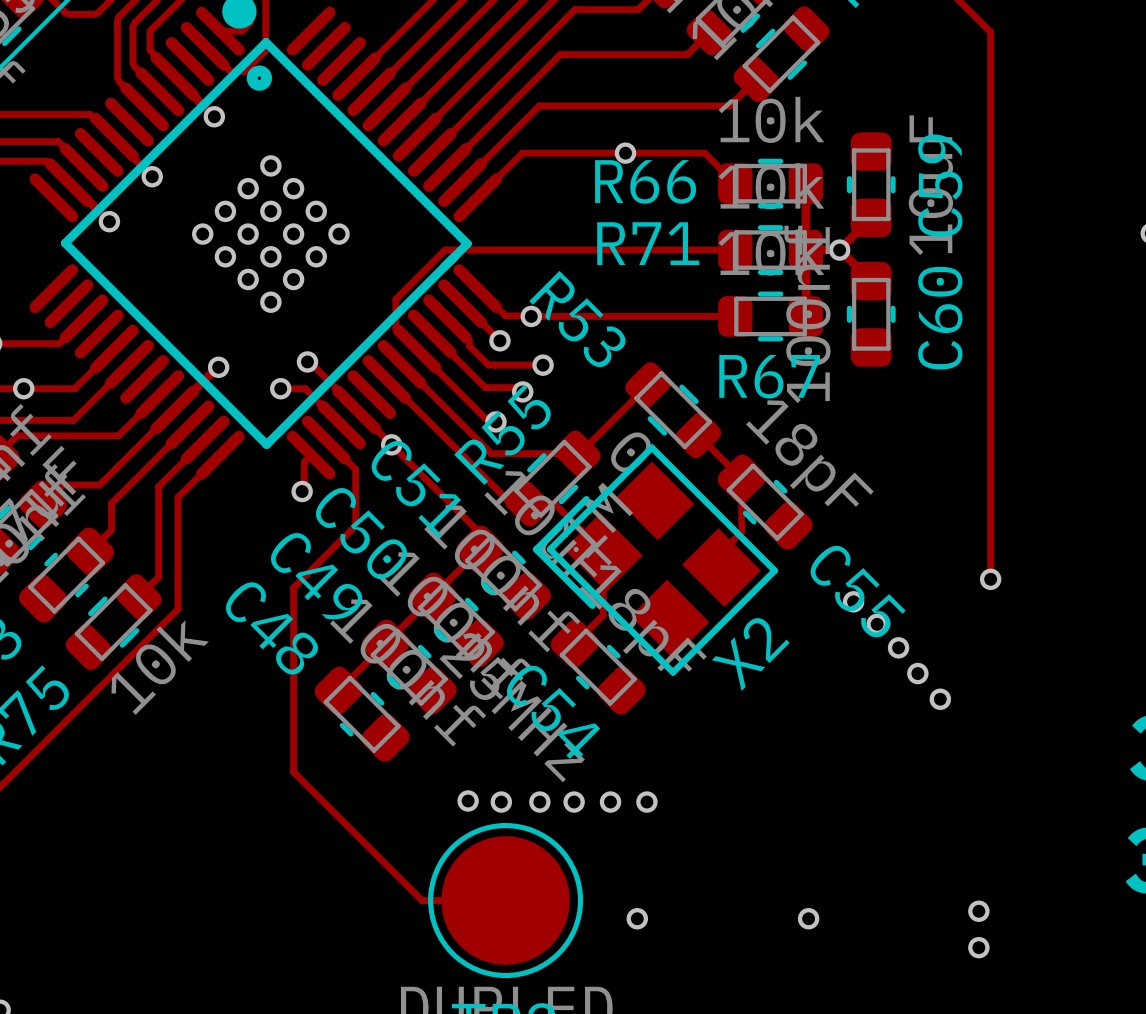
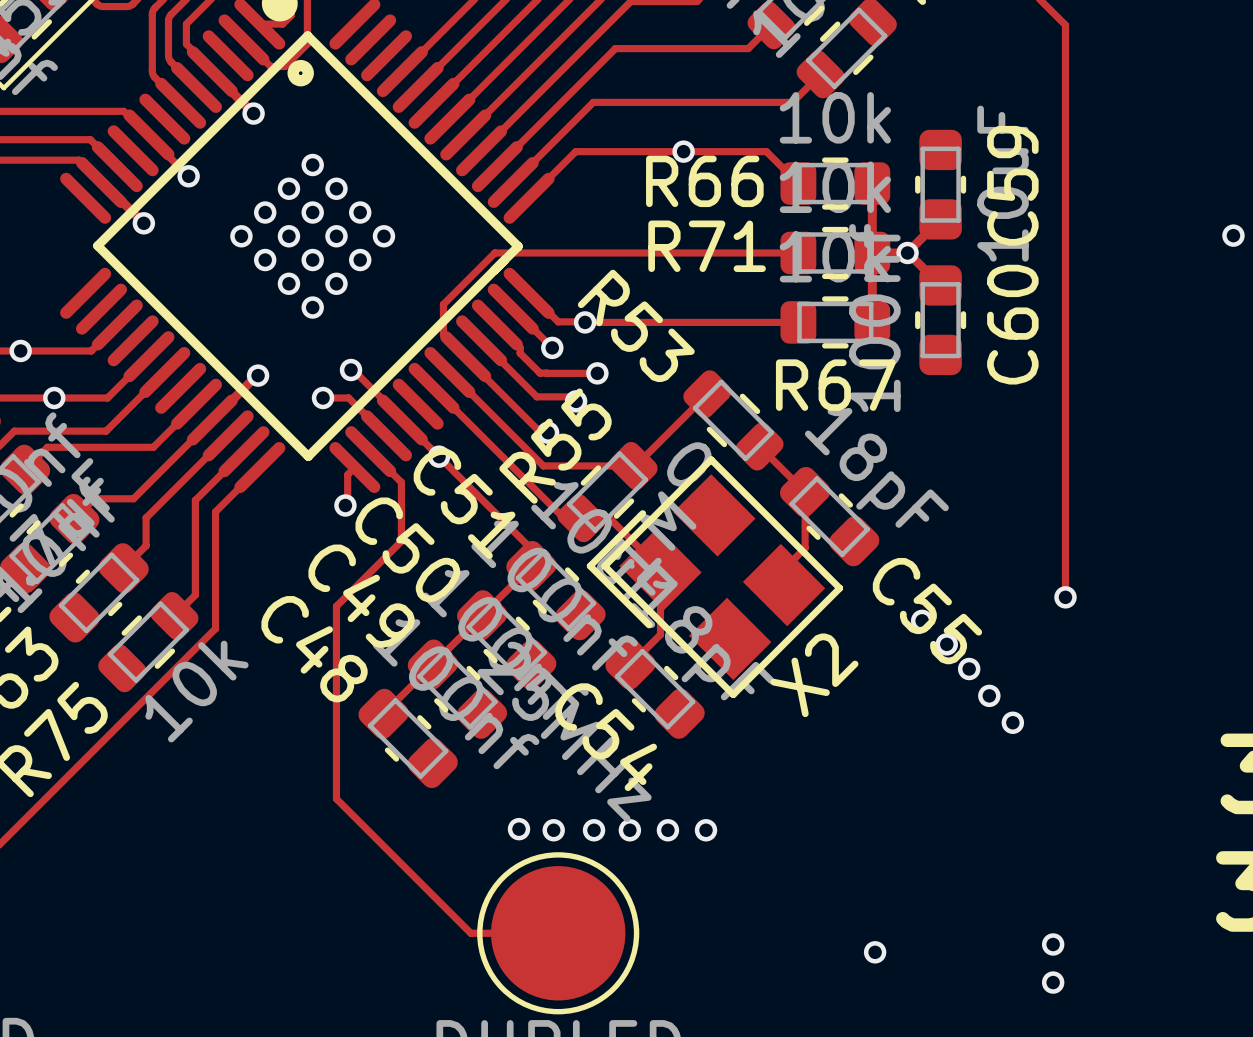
via: (637, 918) -> none

